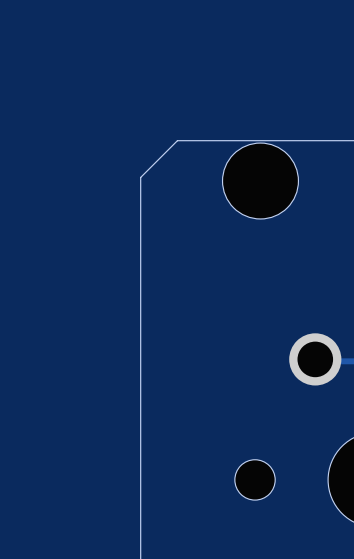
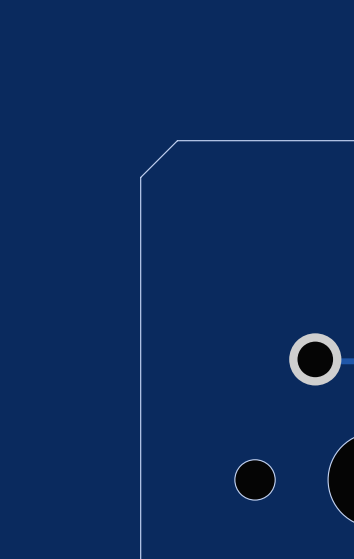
part: (260, 181) -> none

